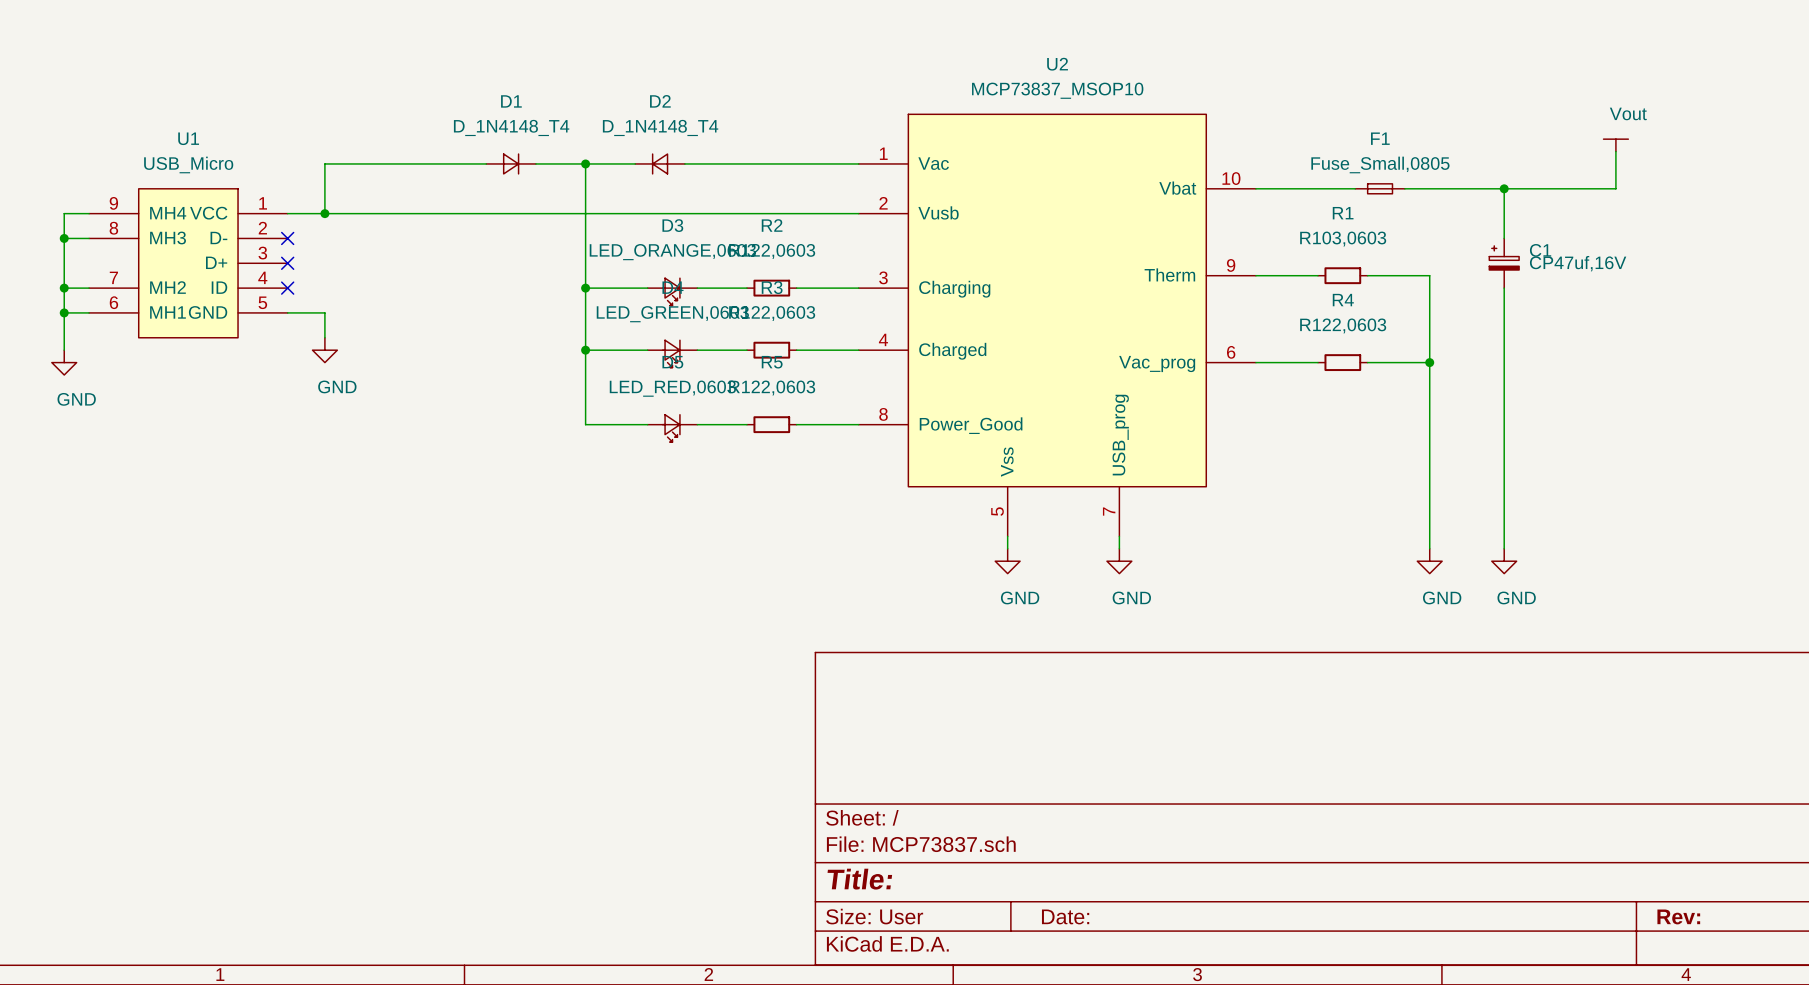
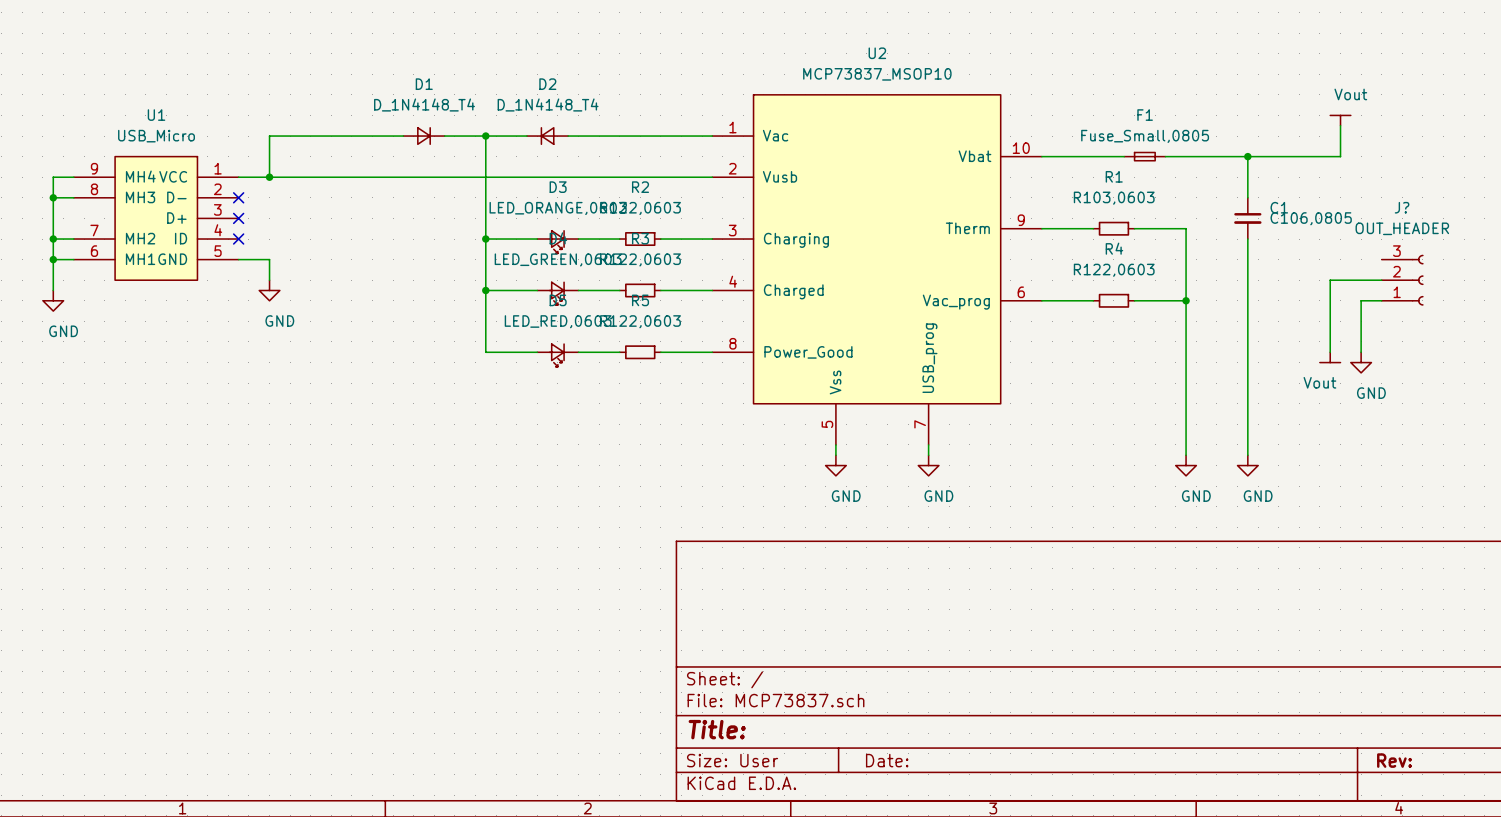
C1 symbol: [1489, 238, 1520, 289] -> [1234, 197, 1262, 240]
C1 value: CP47uf,16V (1578, 263) -> C106,0805 (1311, 218)
wire: none -> (1381, 280) (1330, 280) (1330, 352)
J?: none -> OUT_HEADER (1402, 280)
wire: none -> (1381, 300) (1361, 300) (1361, 352)
power symbol: none -> Vout (1330, 357)
power symbol: none -> GND (1361, 362)

